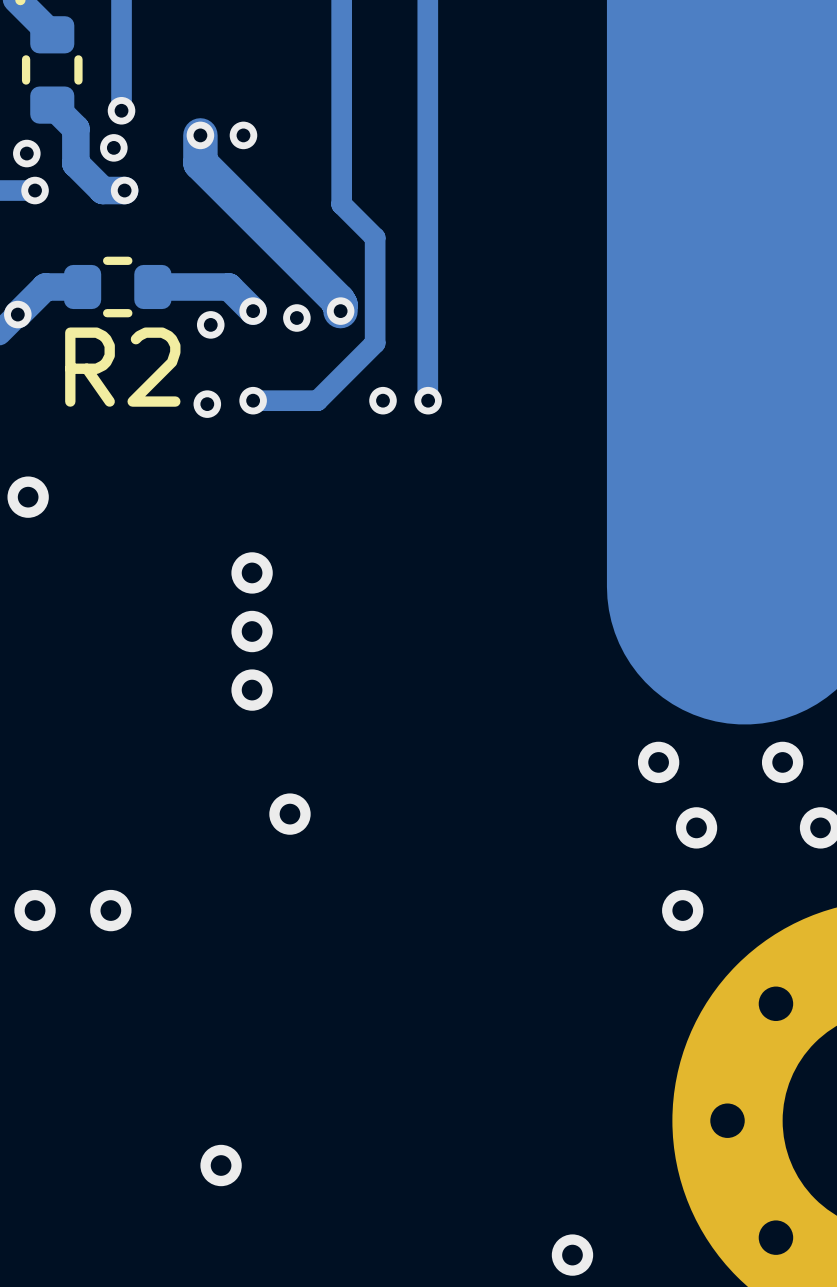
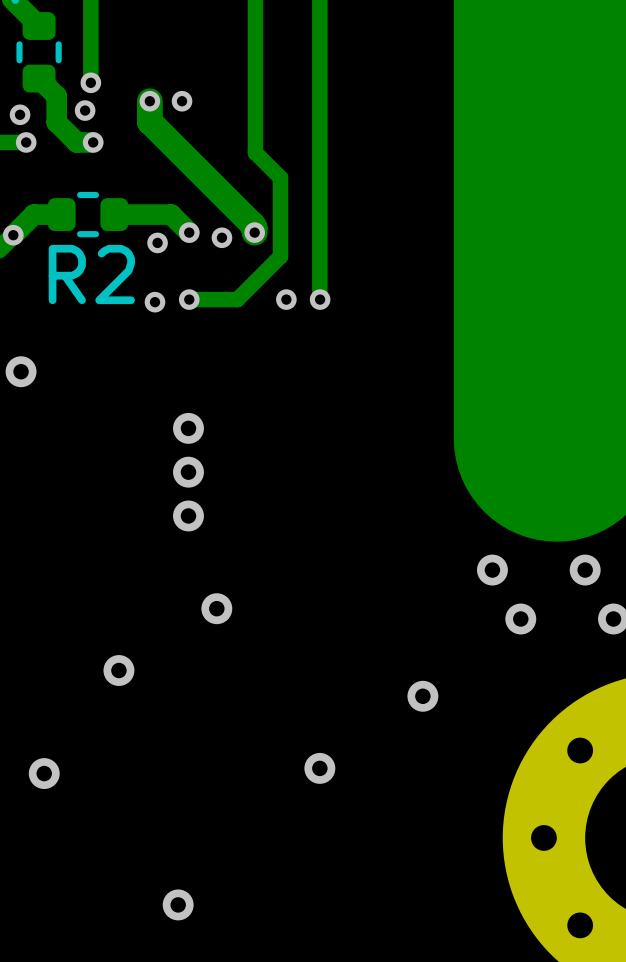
via: (35, 910) -> none
via position: (110, 910) -> (118, 670)
via position: (682, 910) -> (422, 696)
via: none -> (319, 768)
via: none -> (44, 773)
via position: (221, 1165) -> (178, 904)
via: (572, 1255) -> none

